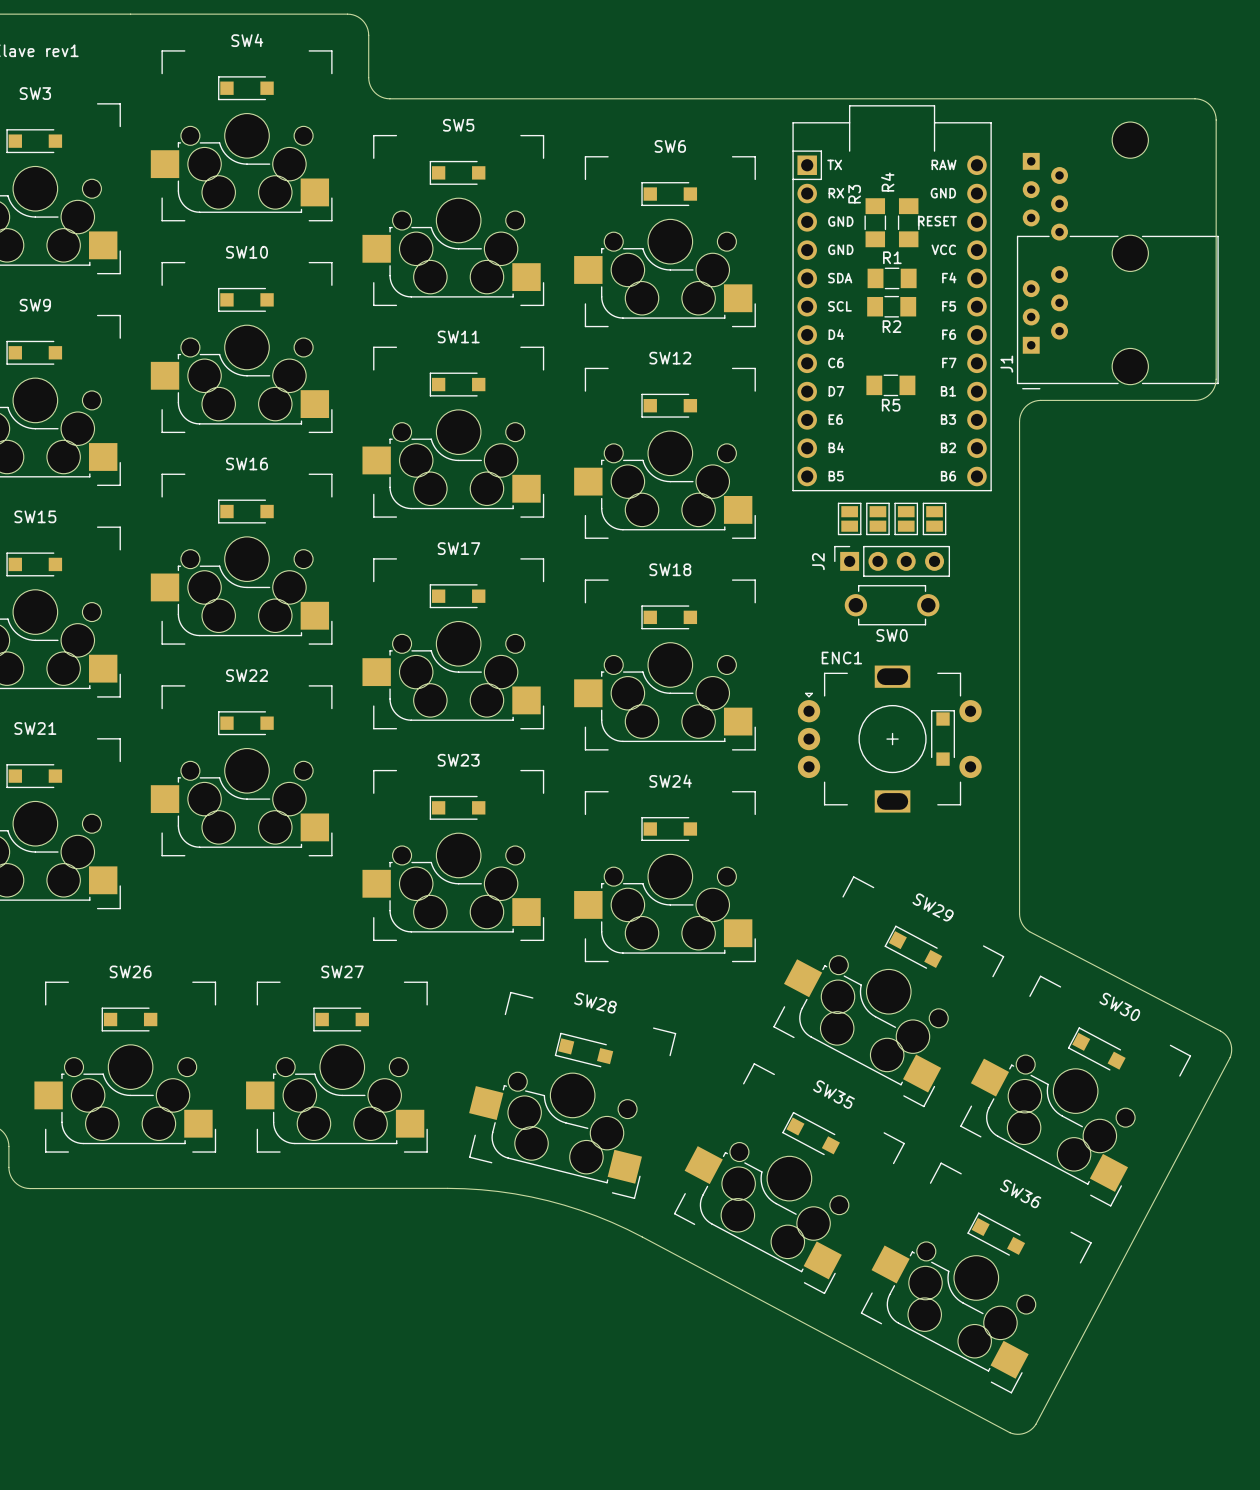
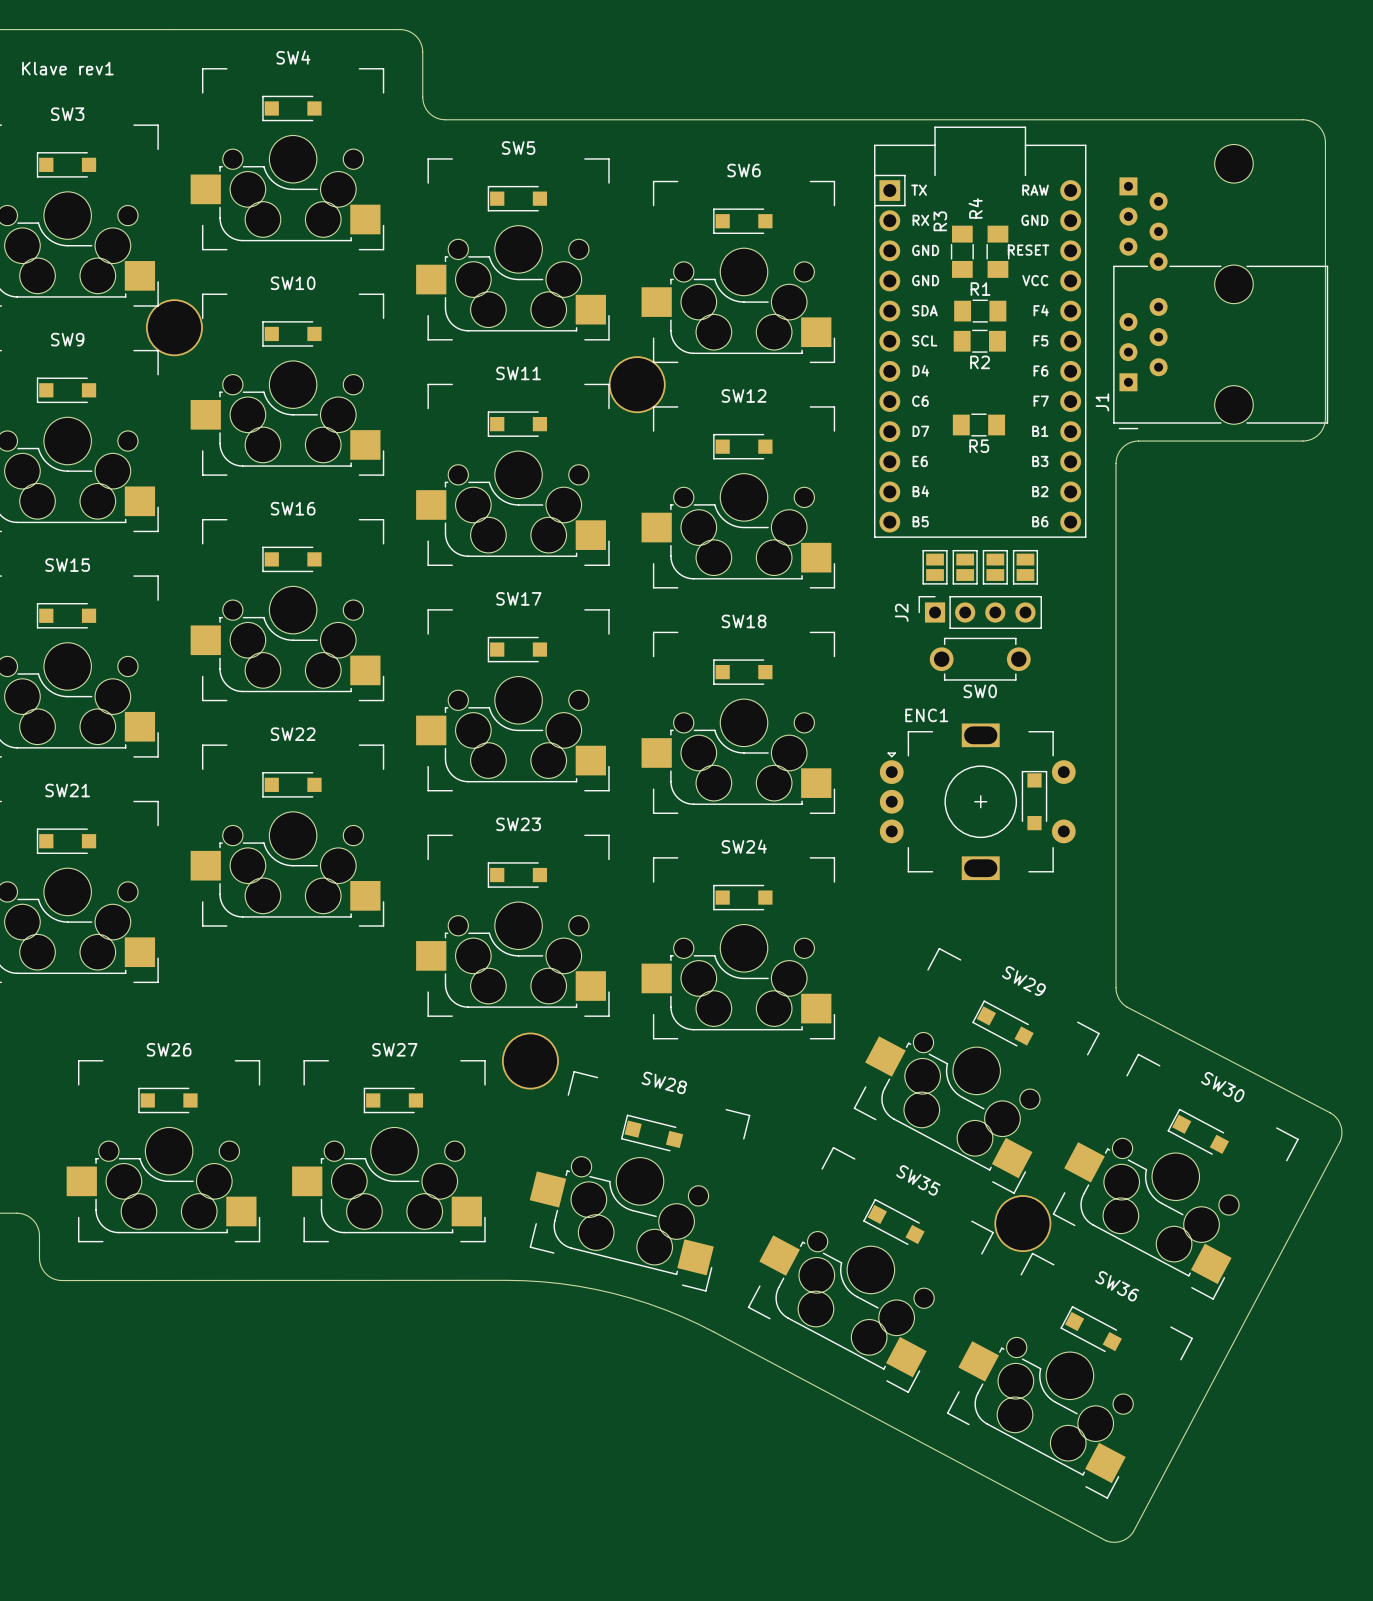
part: none -> (174, 327)
part: none -> (637, 384)
part: none -> (530, 1061)
part: none -> (1022, 1223)

